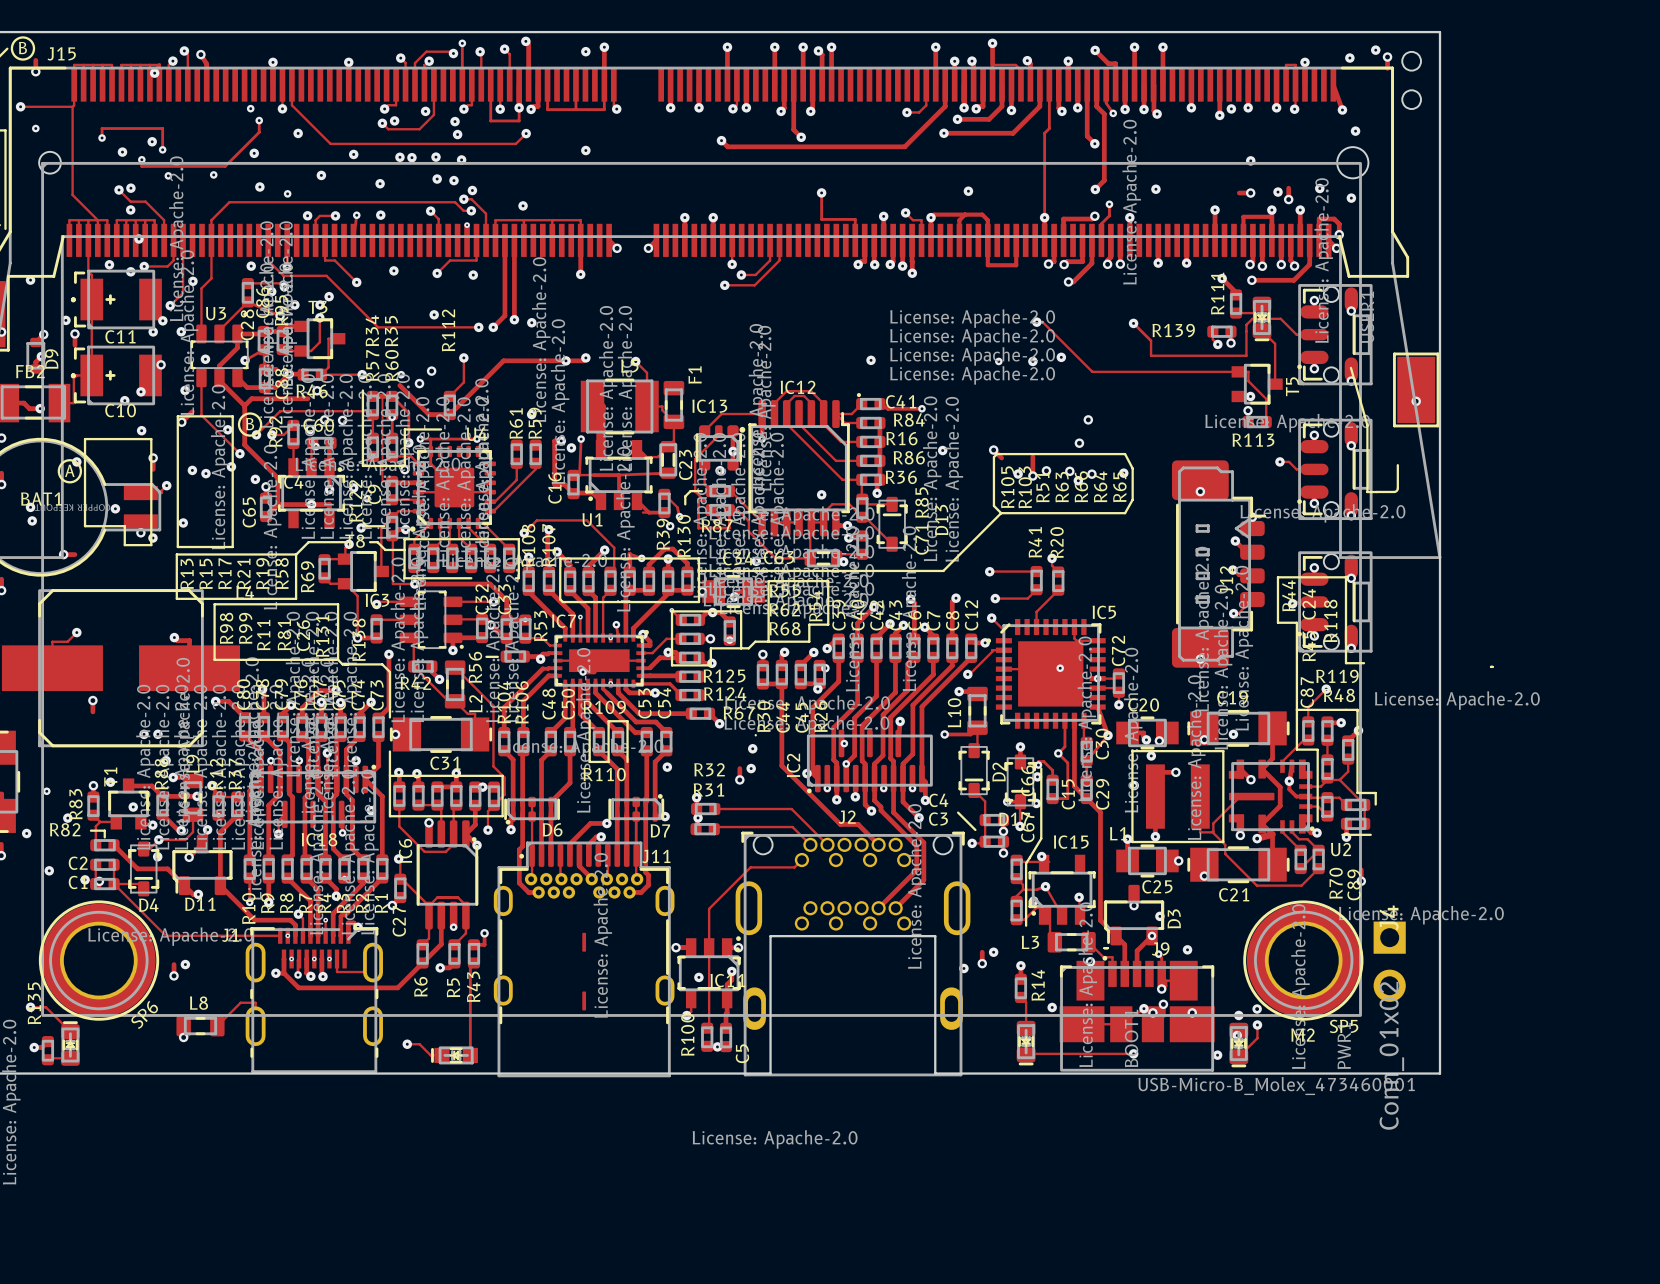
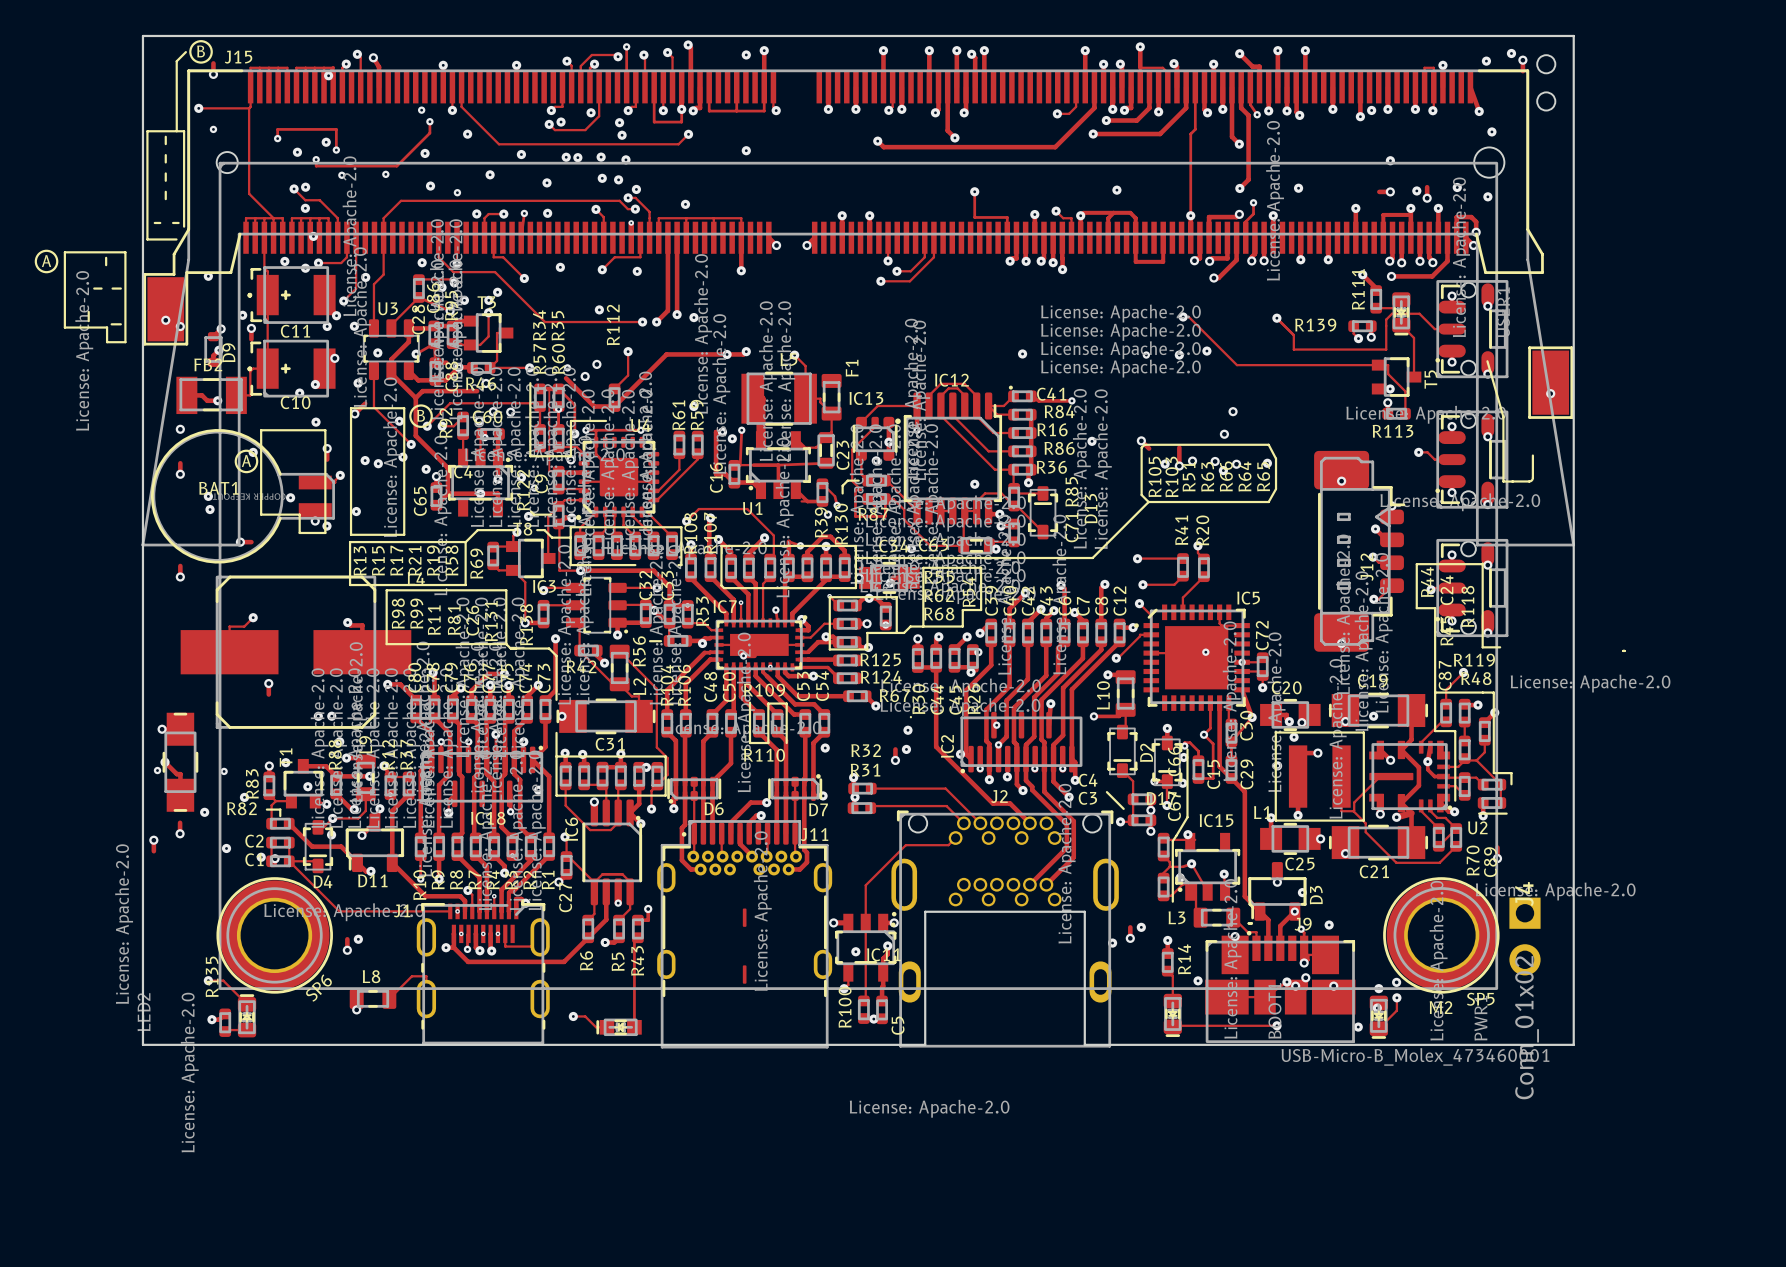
via: (610, 637) -> none

